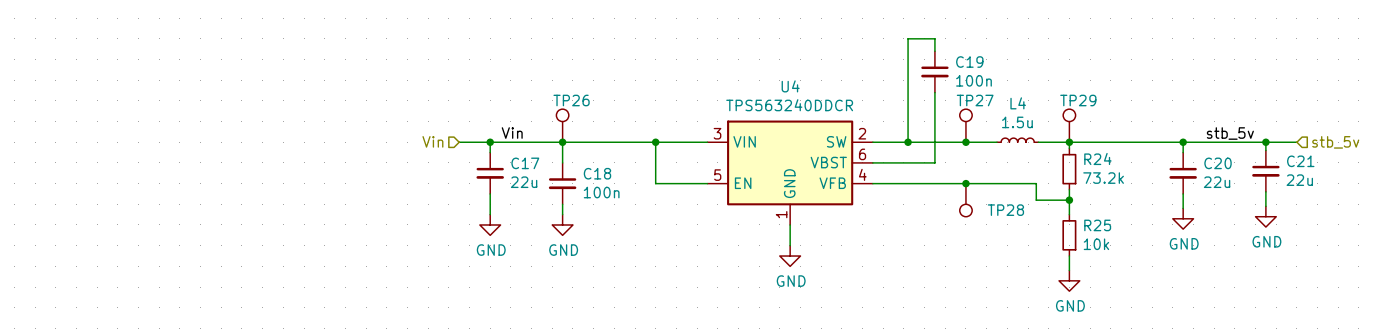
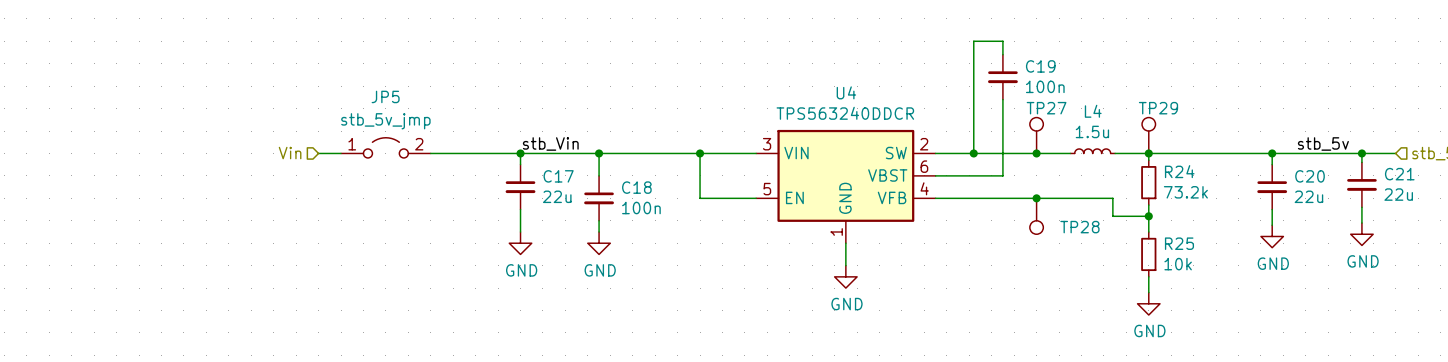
TP26: (562, 125) -> none
label: Vin (512, 133) -> none
label: none -> stb_Vin (550, 143)
JP5: none -> stb_5v_jmp (385, 147)
hierarchical label position: Vin (432, 141) -> Vin (290, 153)
wire: none -> (318, 153) (341, 153)
wire: none -> (430, 153) (486, 153)

